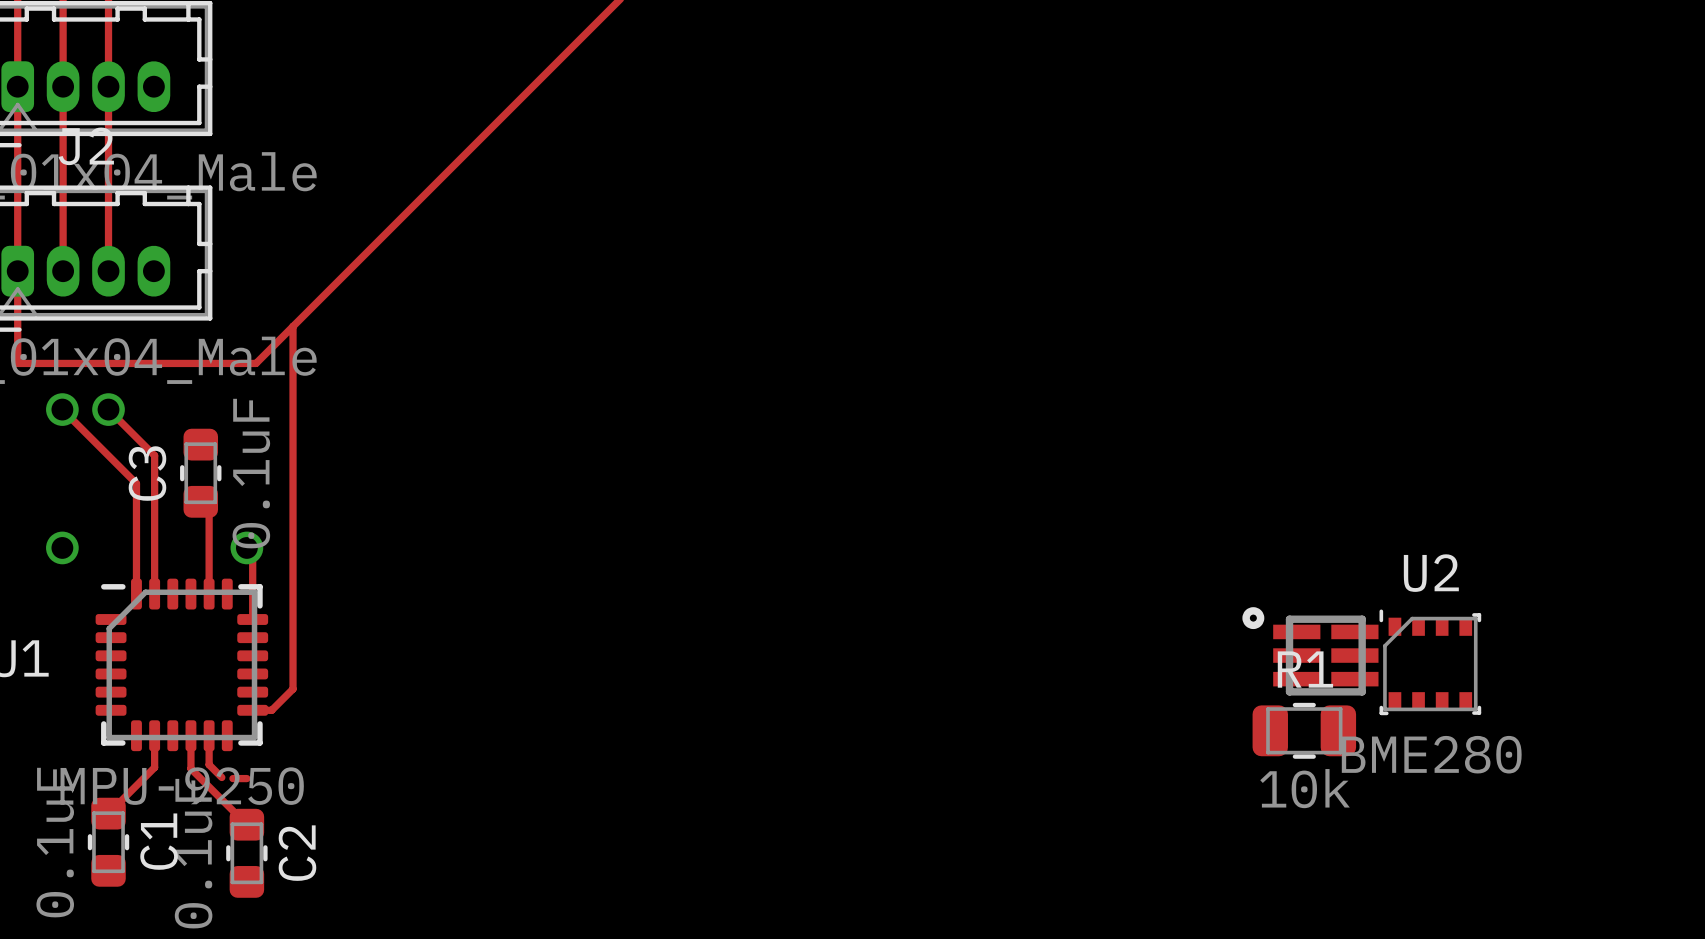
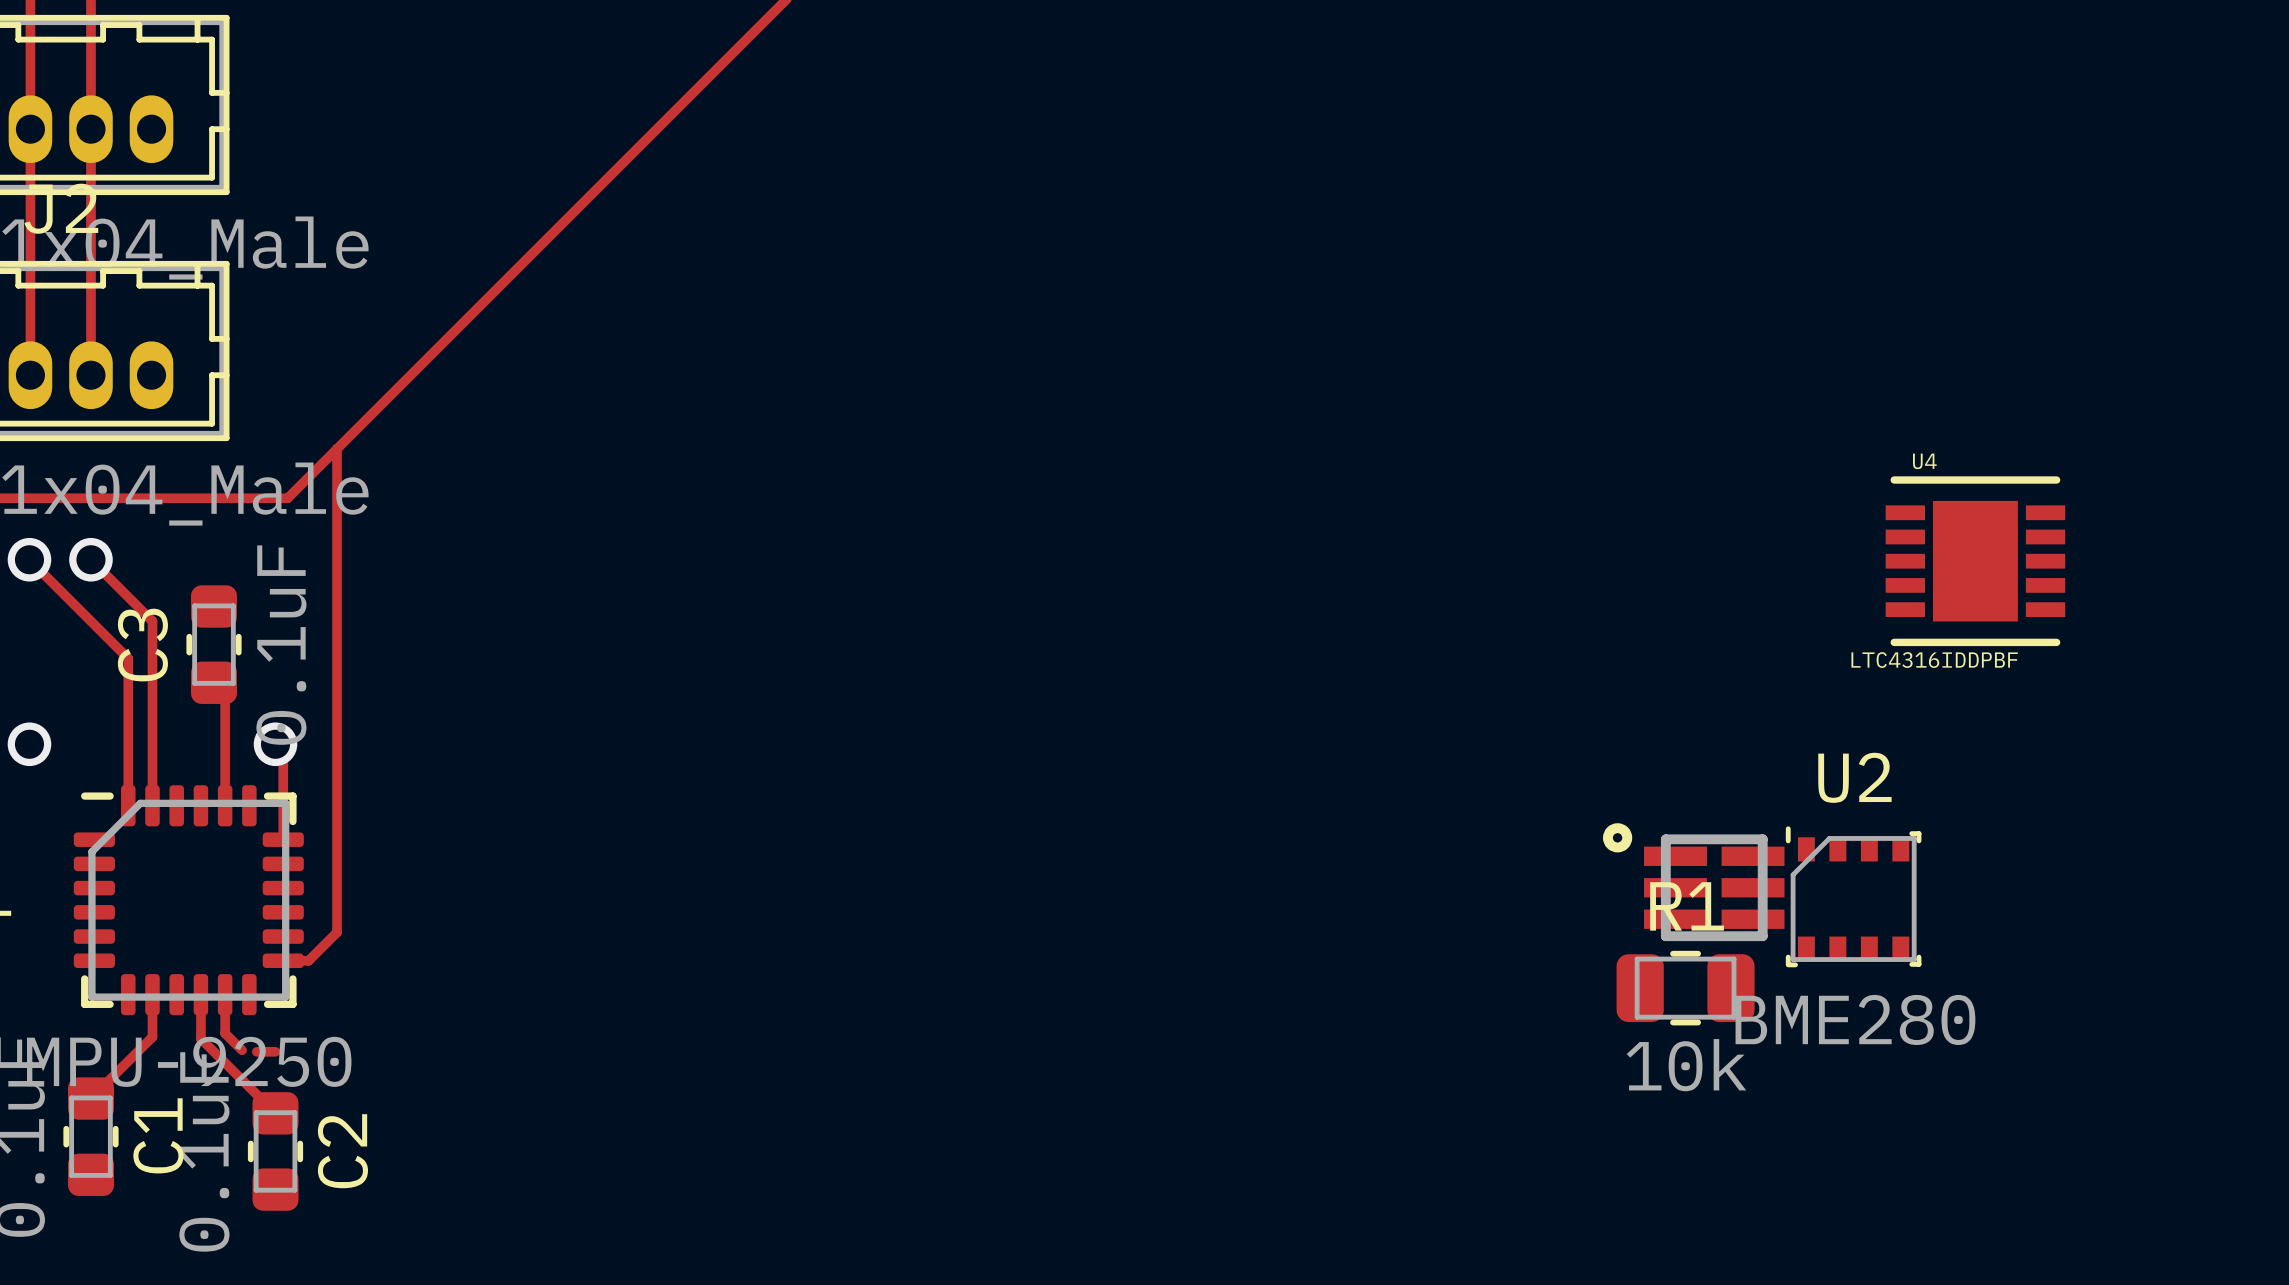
U4: none -> LTC4316IDDPBF (1975, 561)

